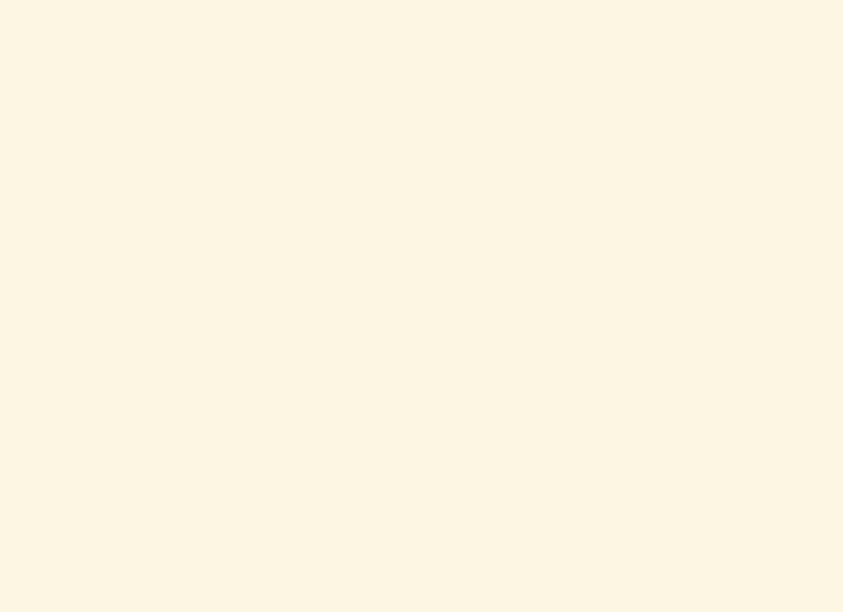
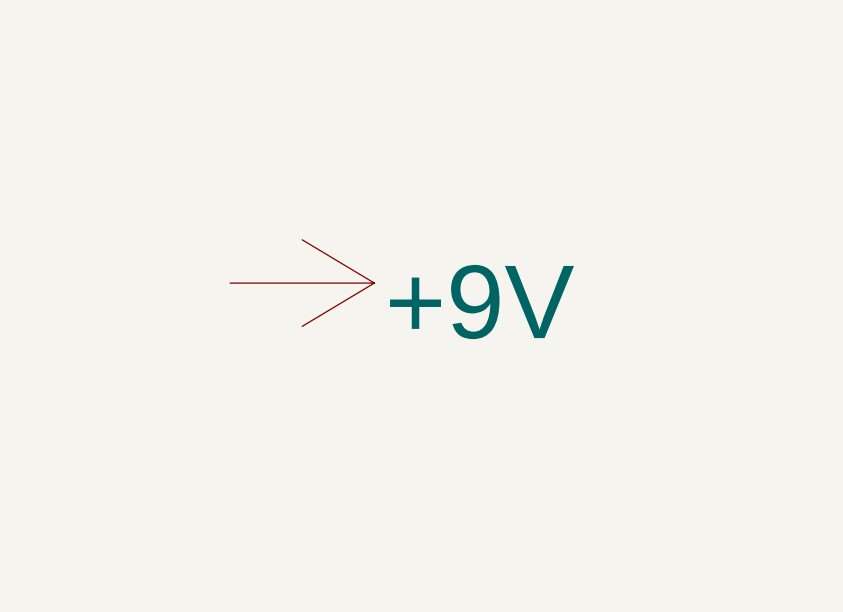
power symbol: none -> +9V (302, 283)

